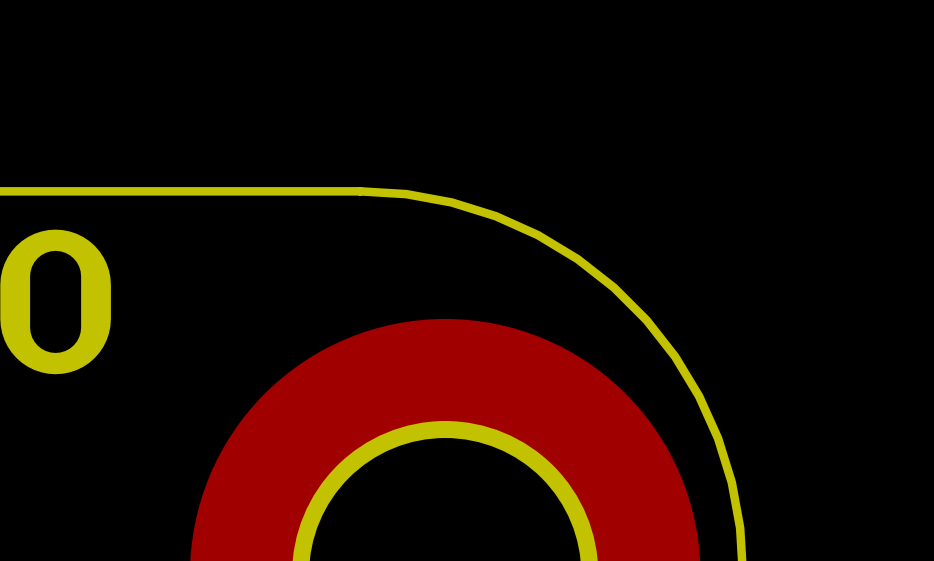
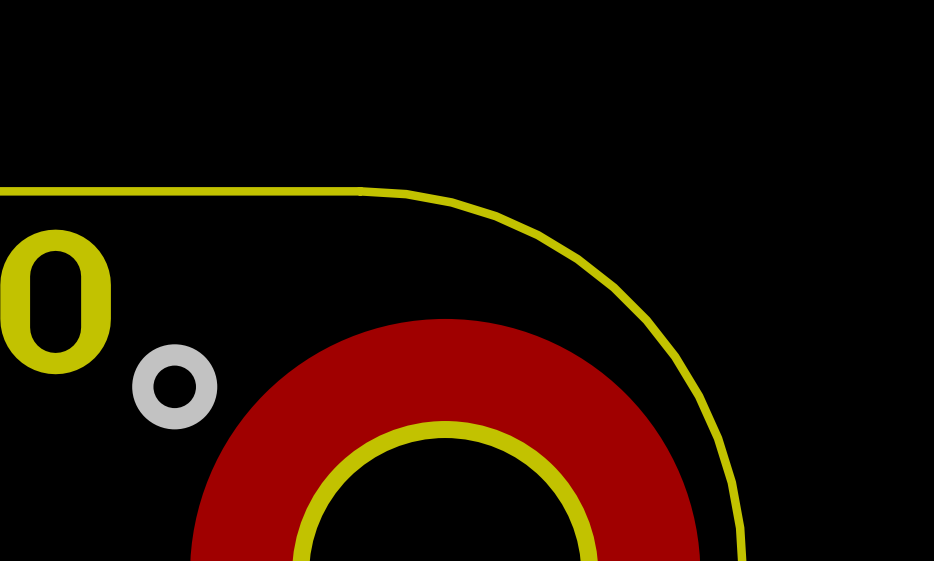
via: none -> (174, 386)

